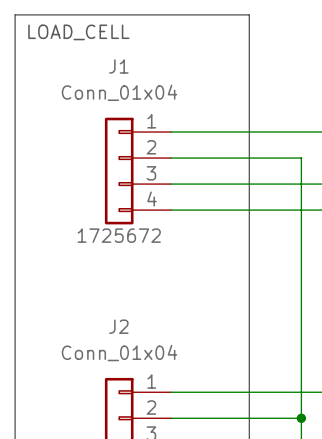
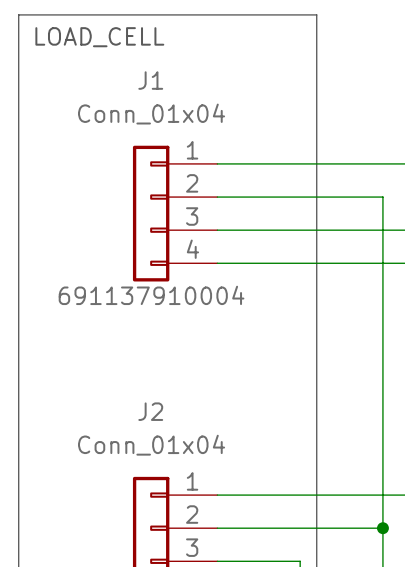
J1 text: 1725672 (119, 235) -> 691137910004 (151, 295)

